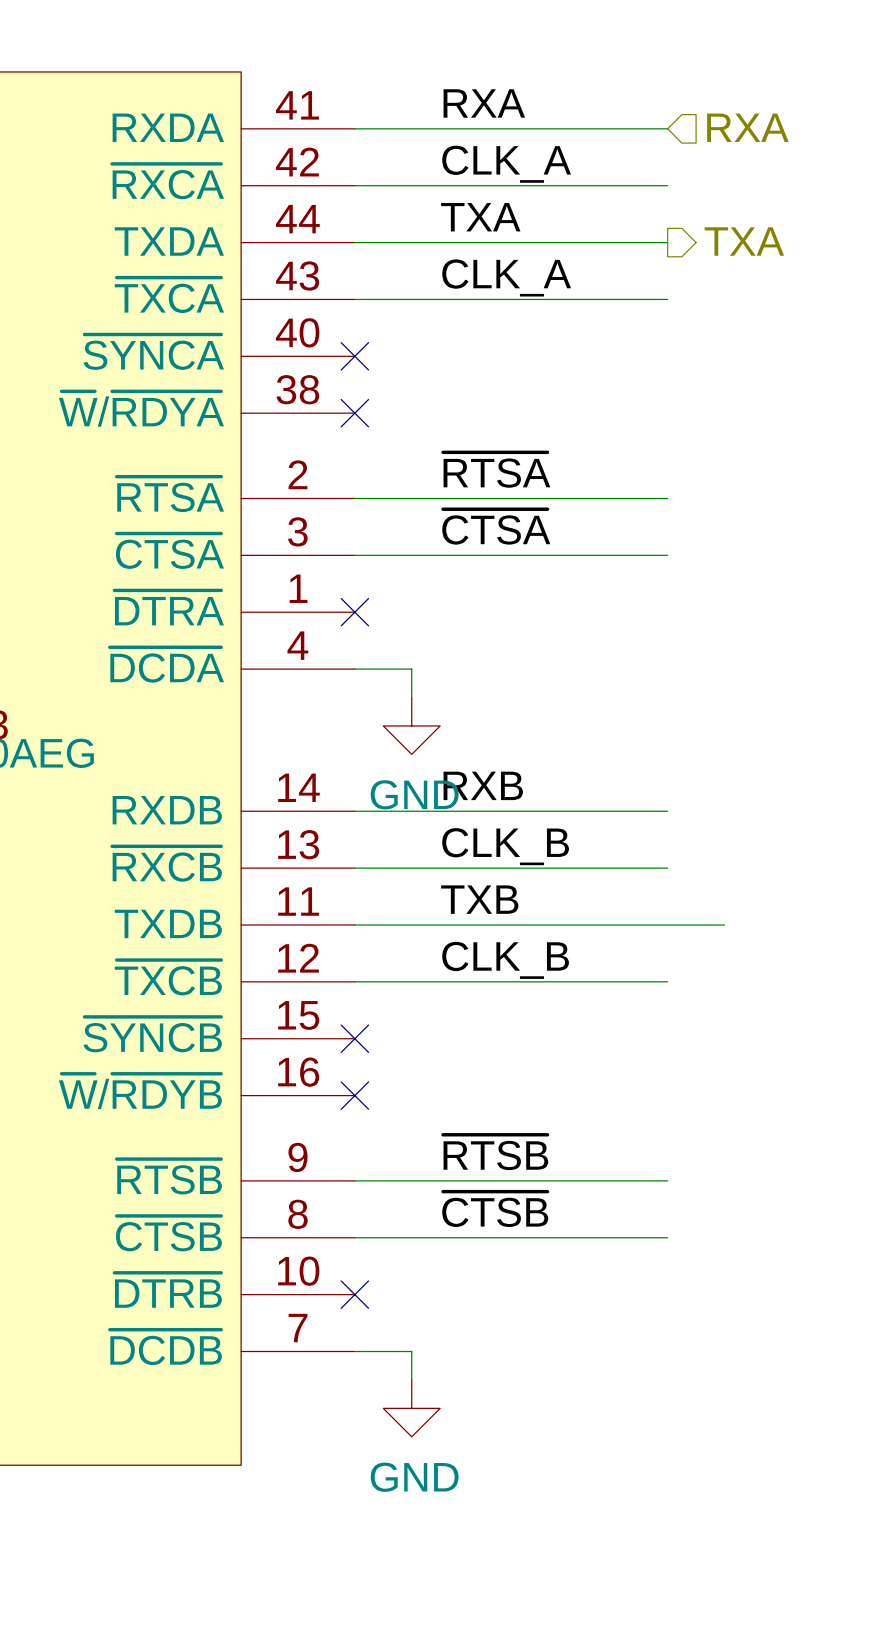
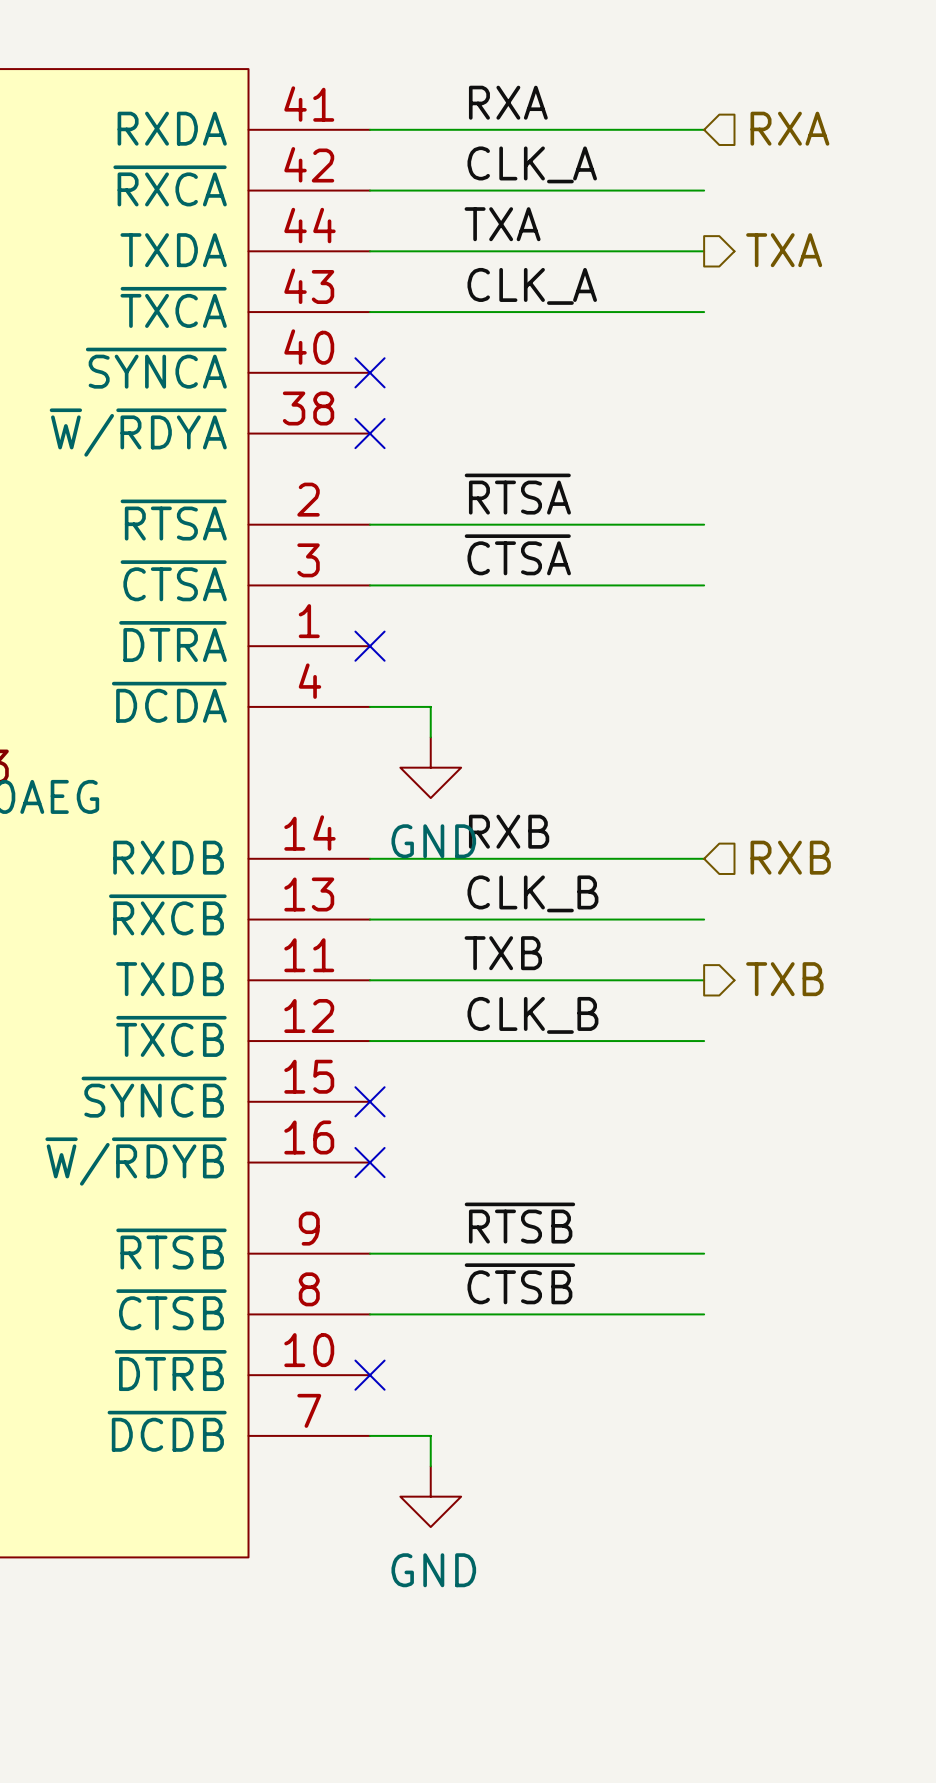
hierarchical label: none -> RXB (790, 857)
hierarchical label: none -> TXB (784, 979)
wire: (667, 924) (724, 924) -> none

